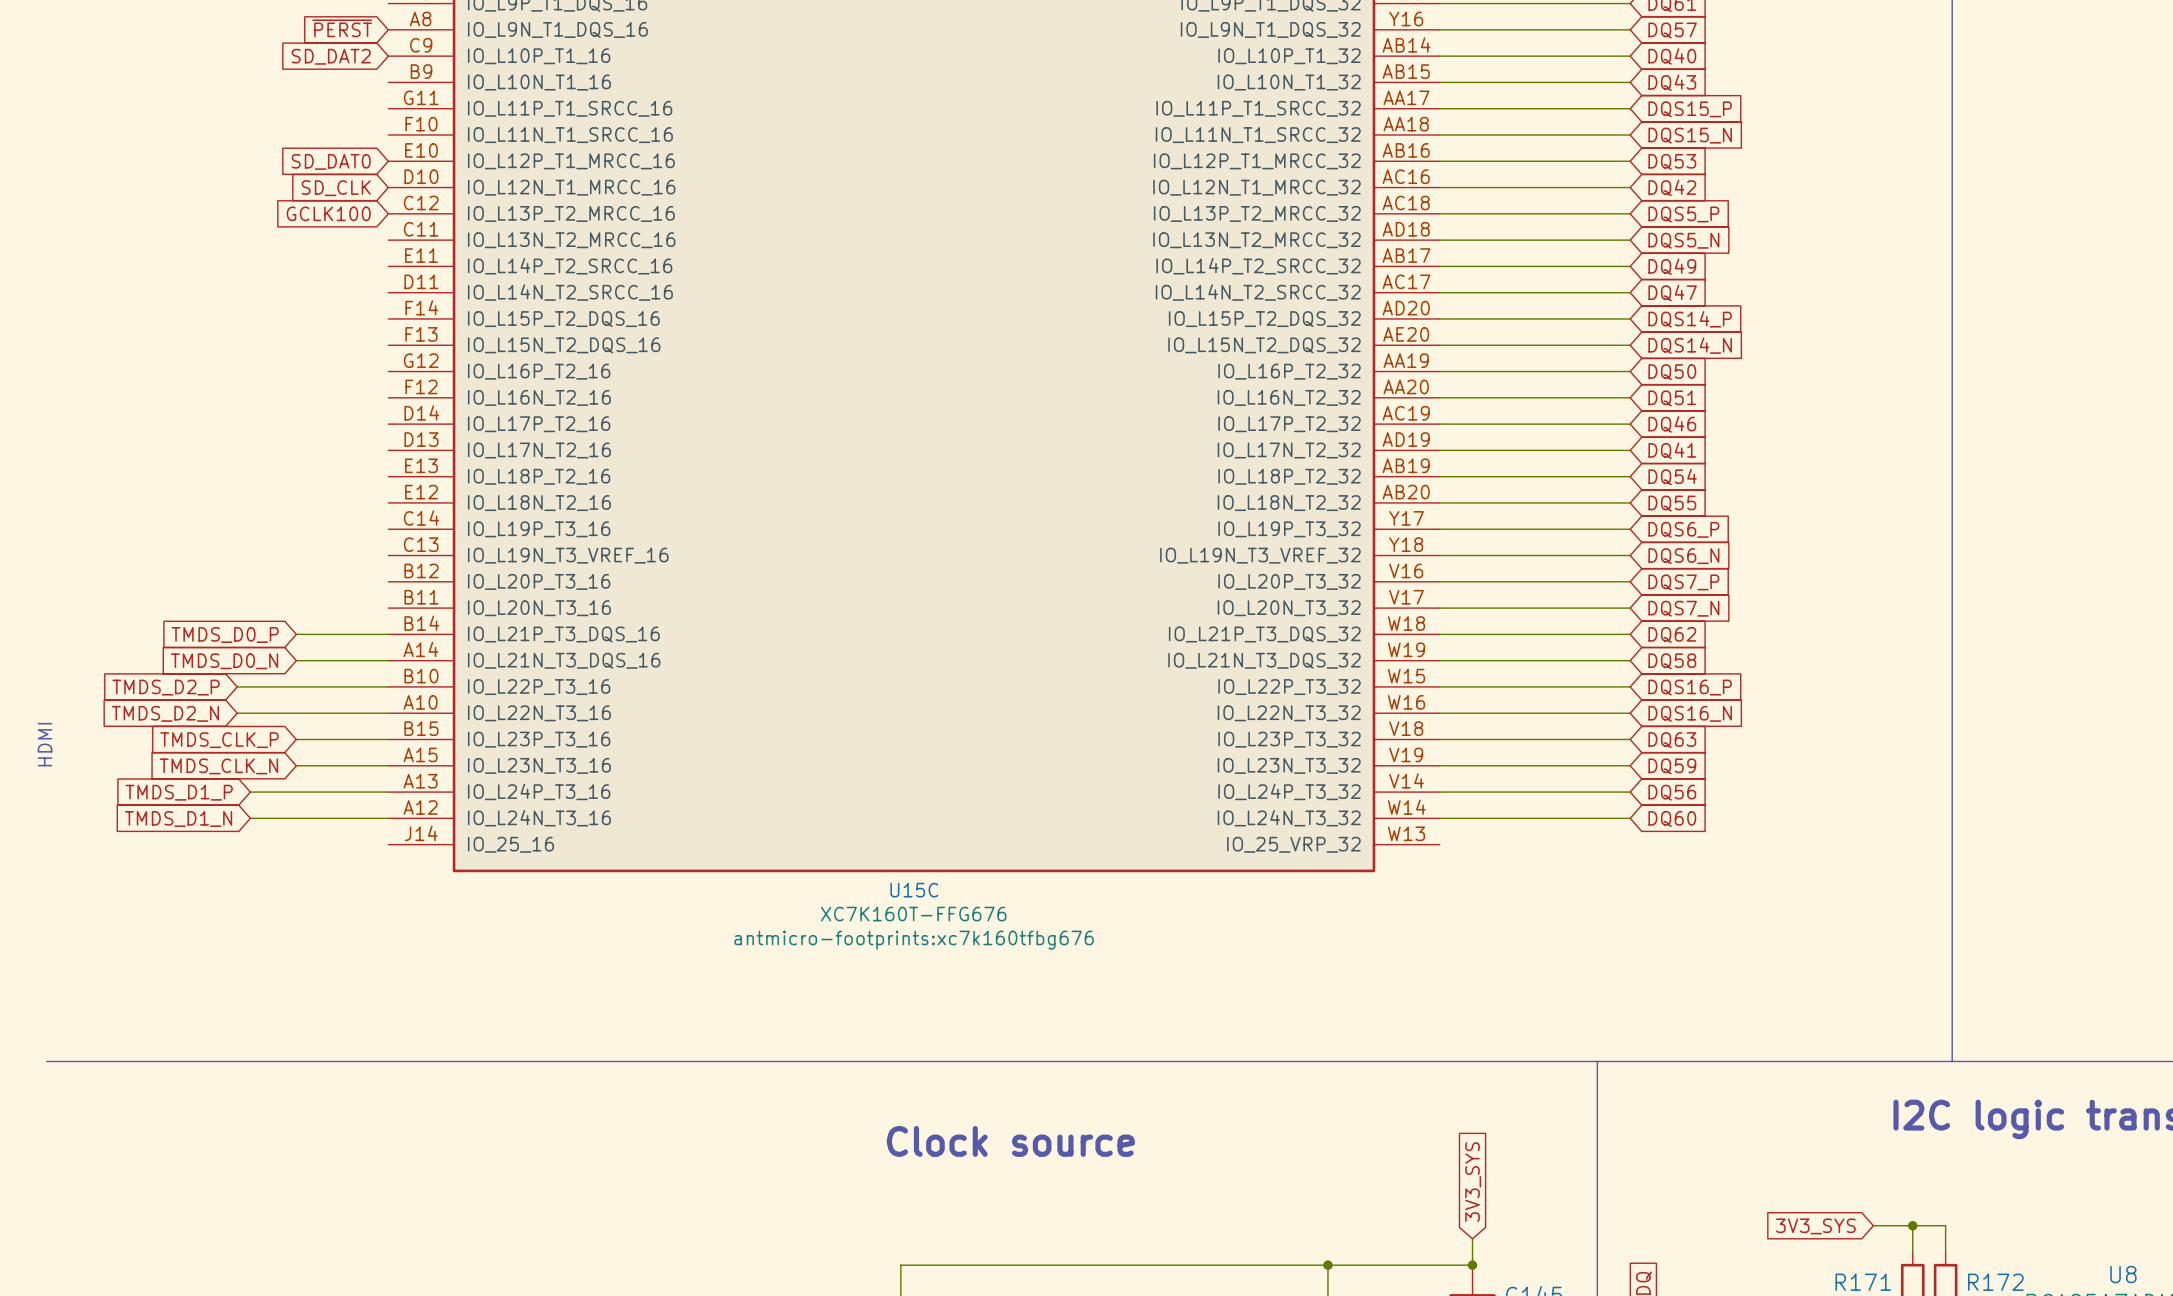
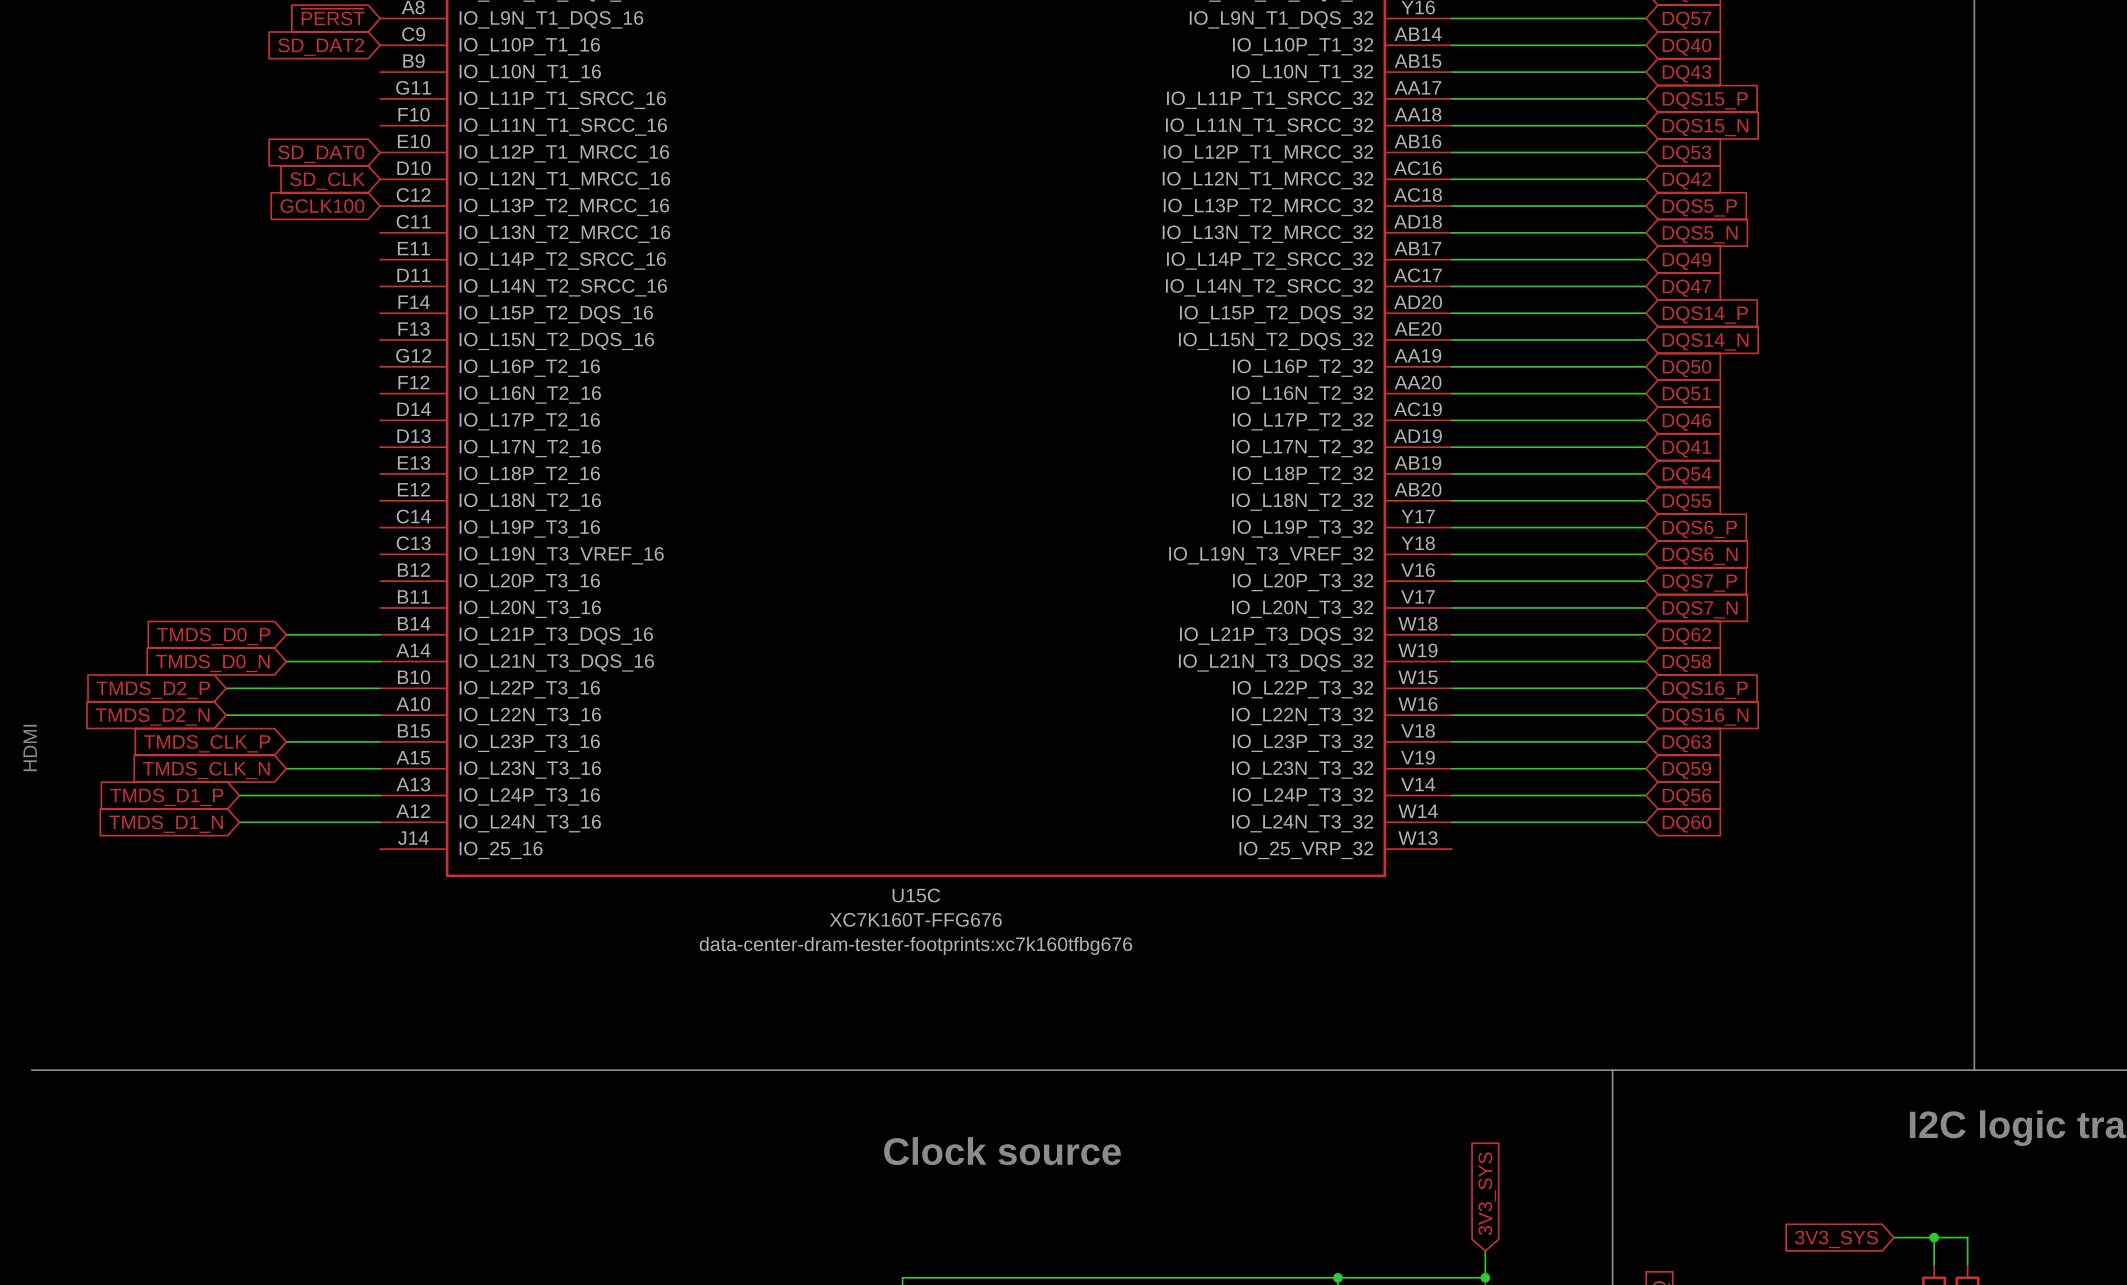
U15C text: antmicro-footprints:xc7k160tfbg676 (914, 940) -> data-center-dram-tester-footprints:xc7k160tfbg676 (915, 945)

